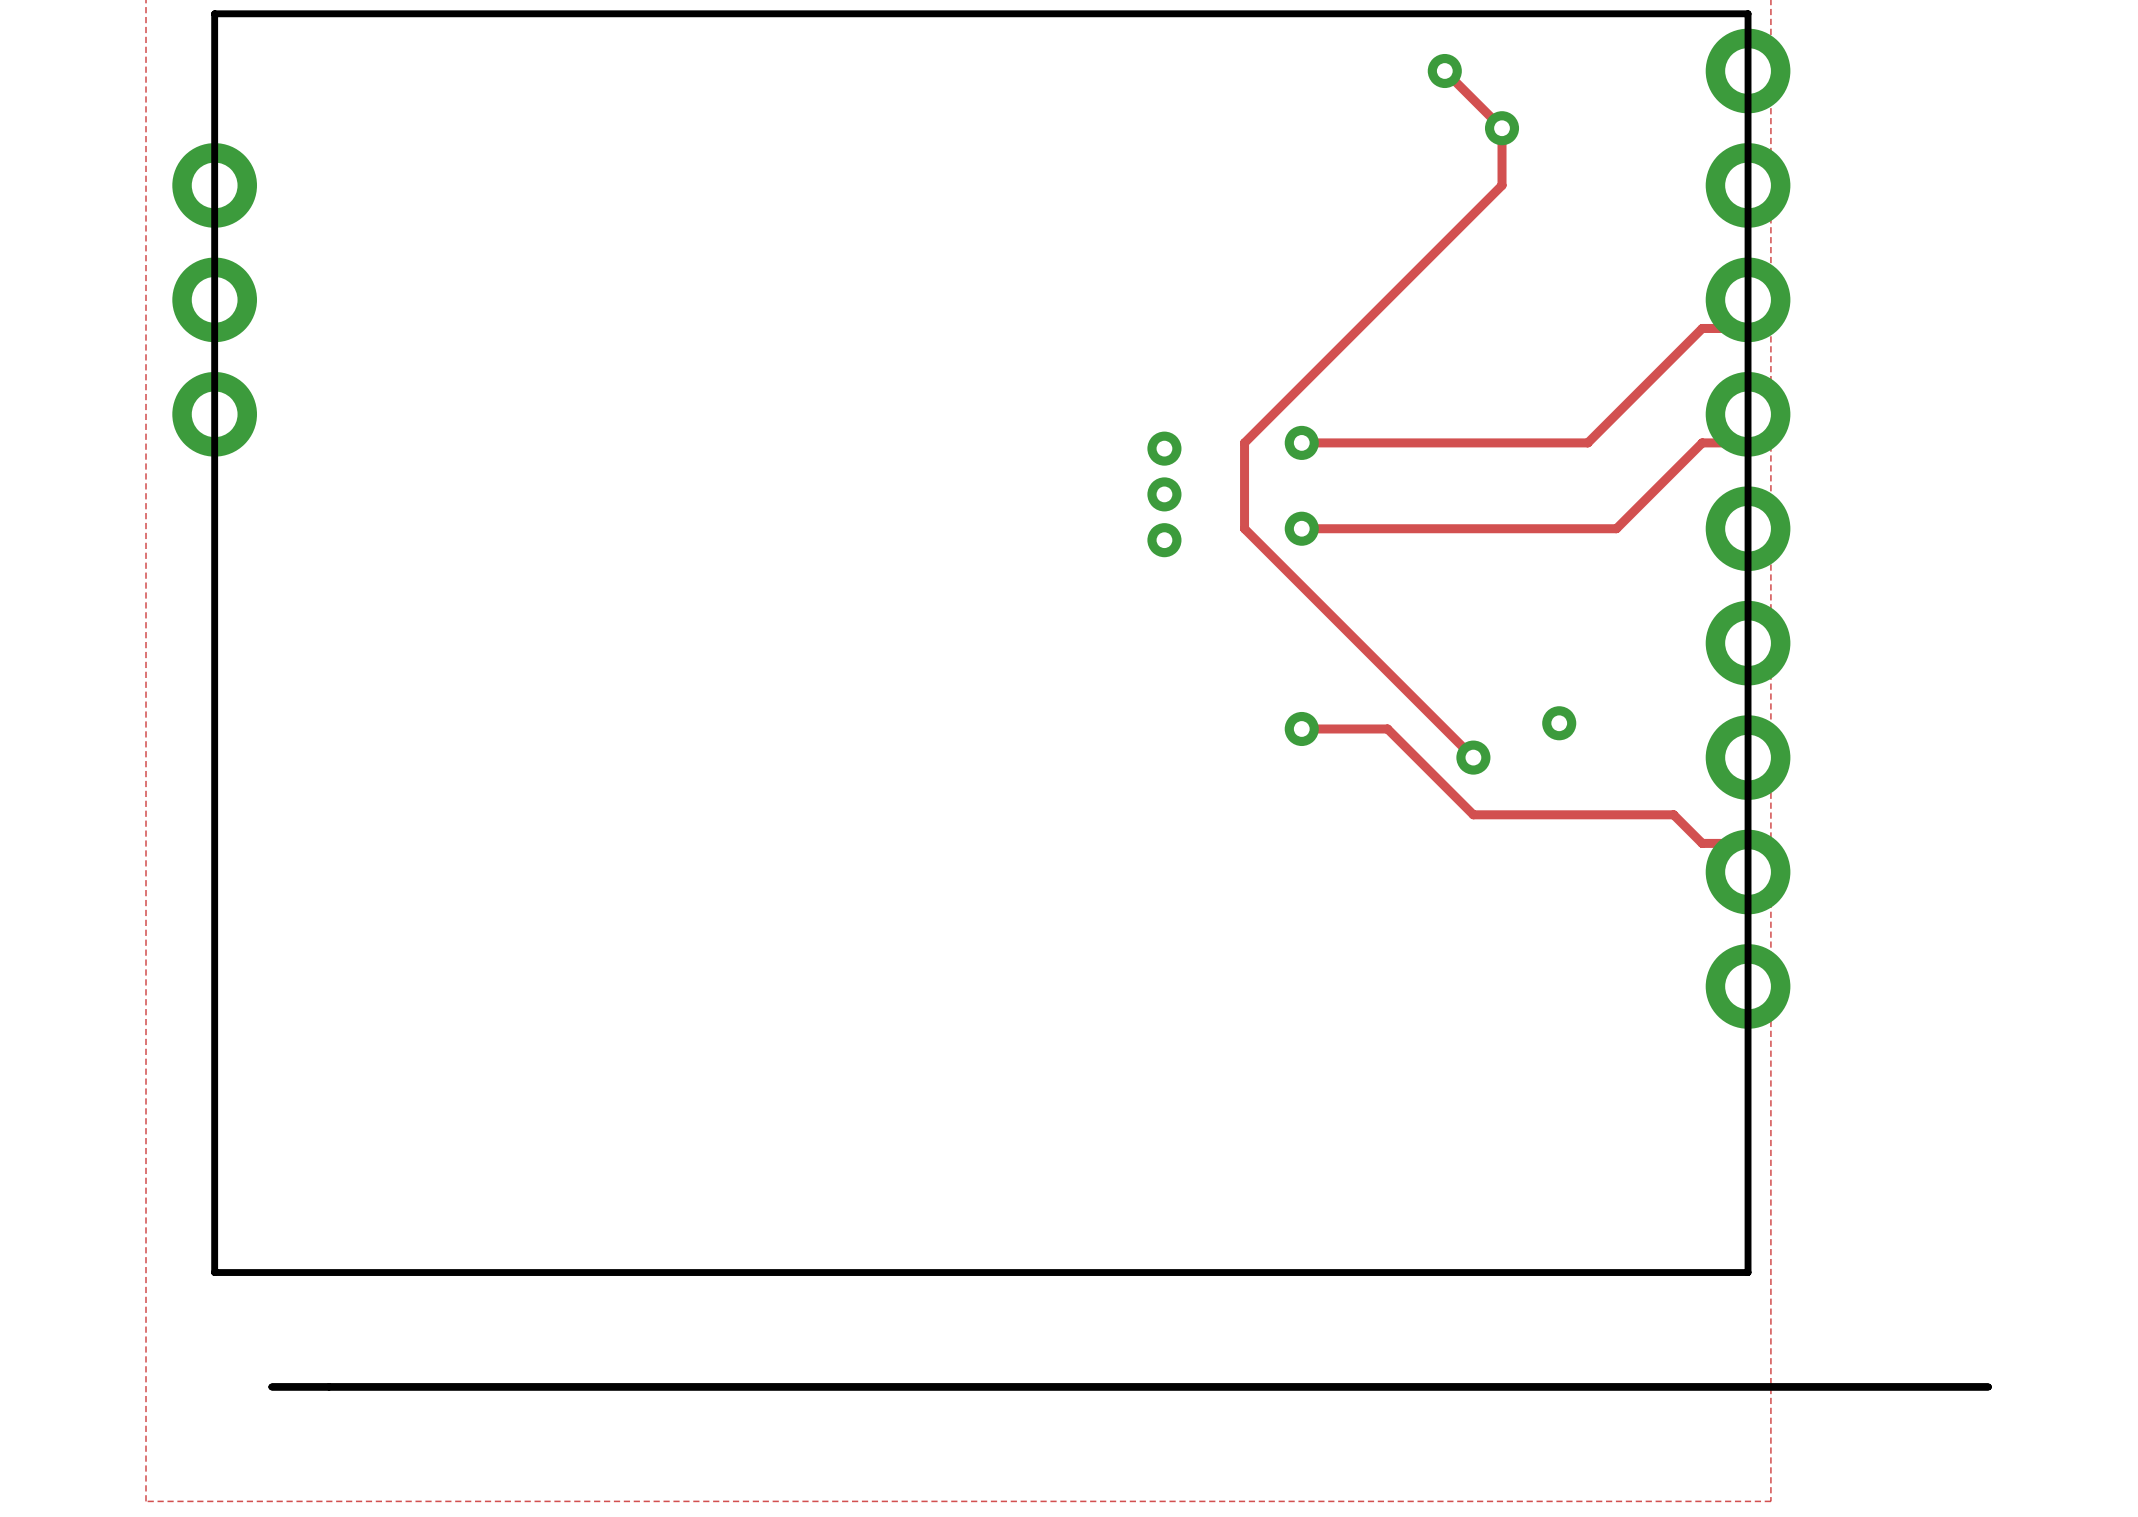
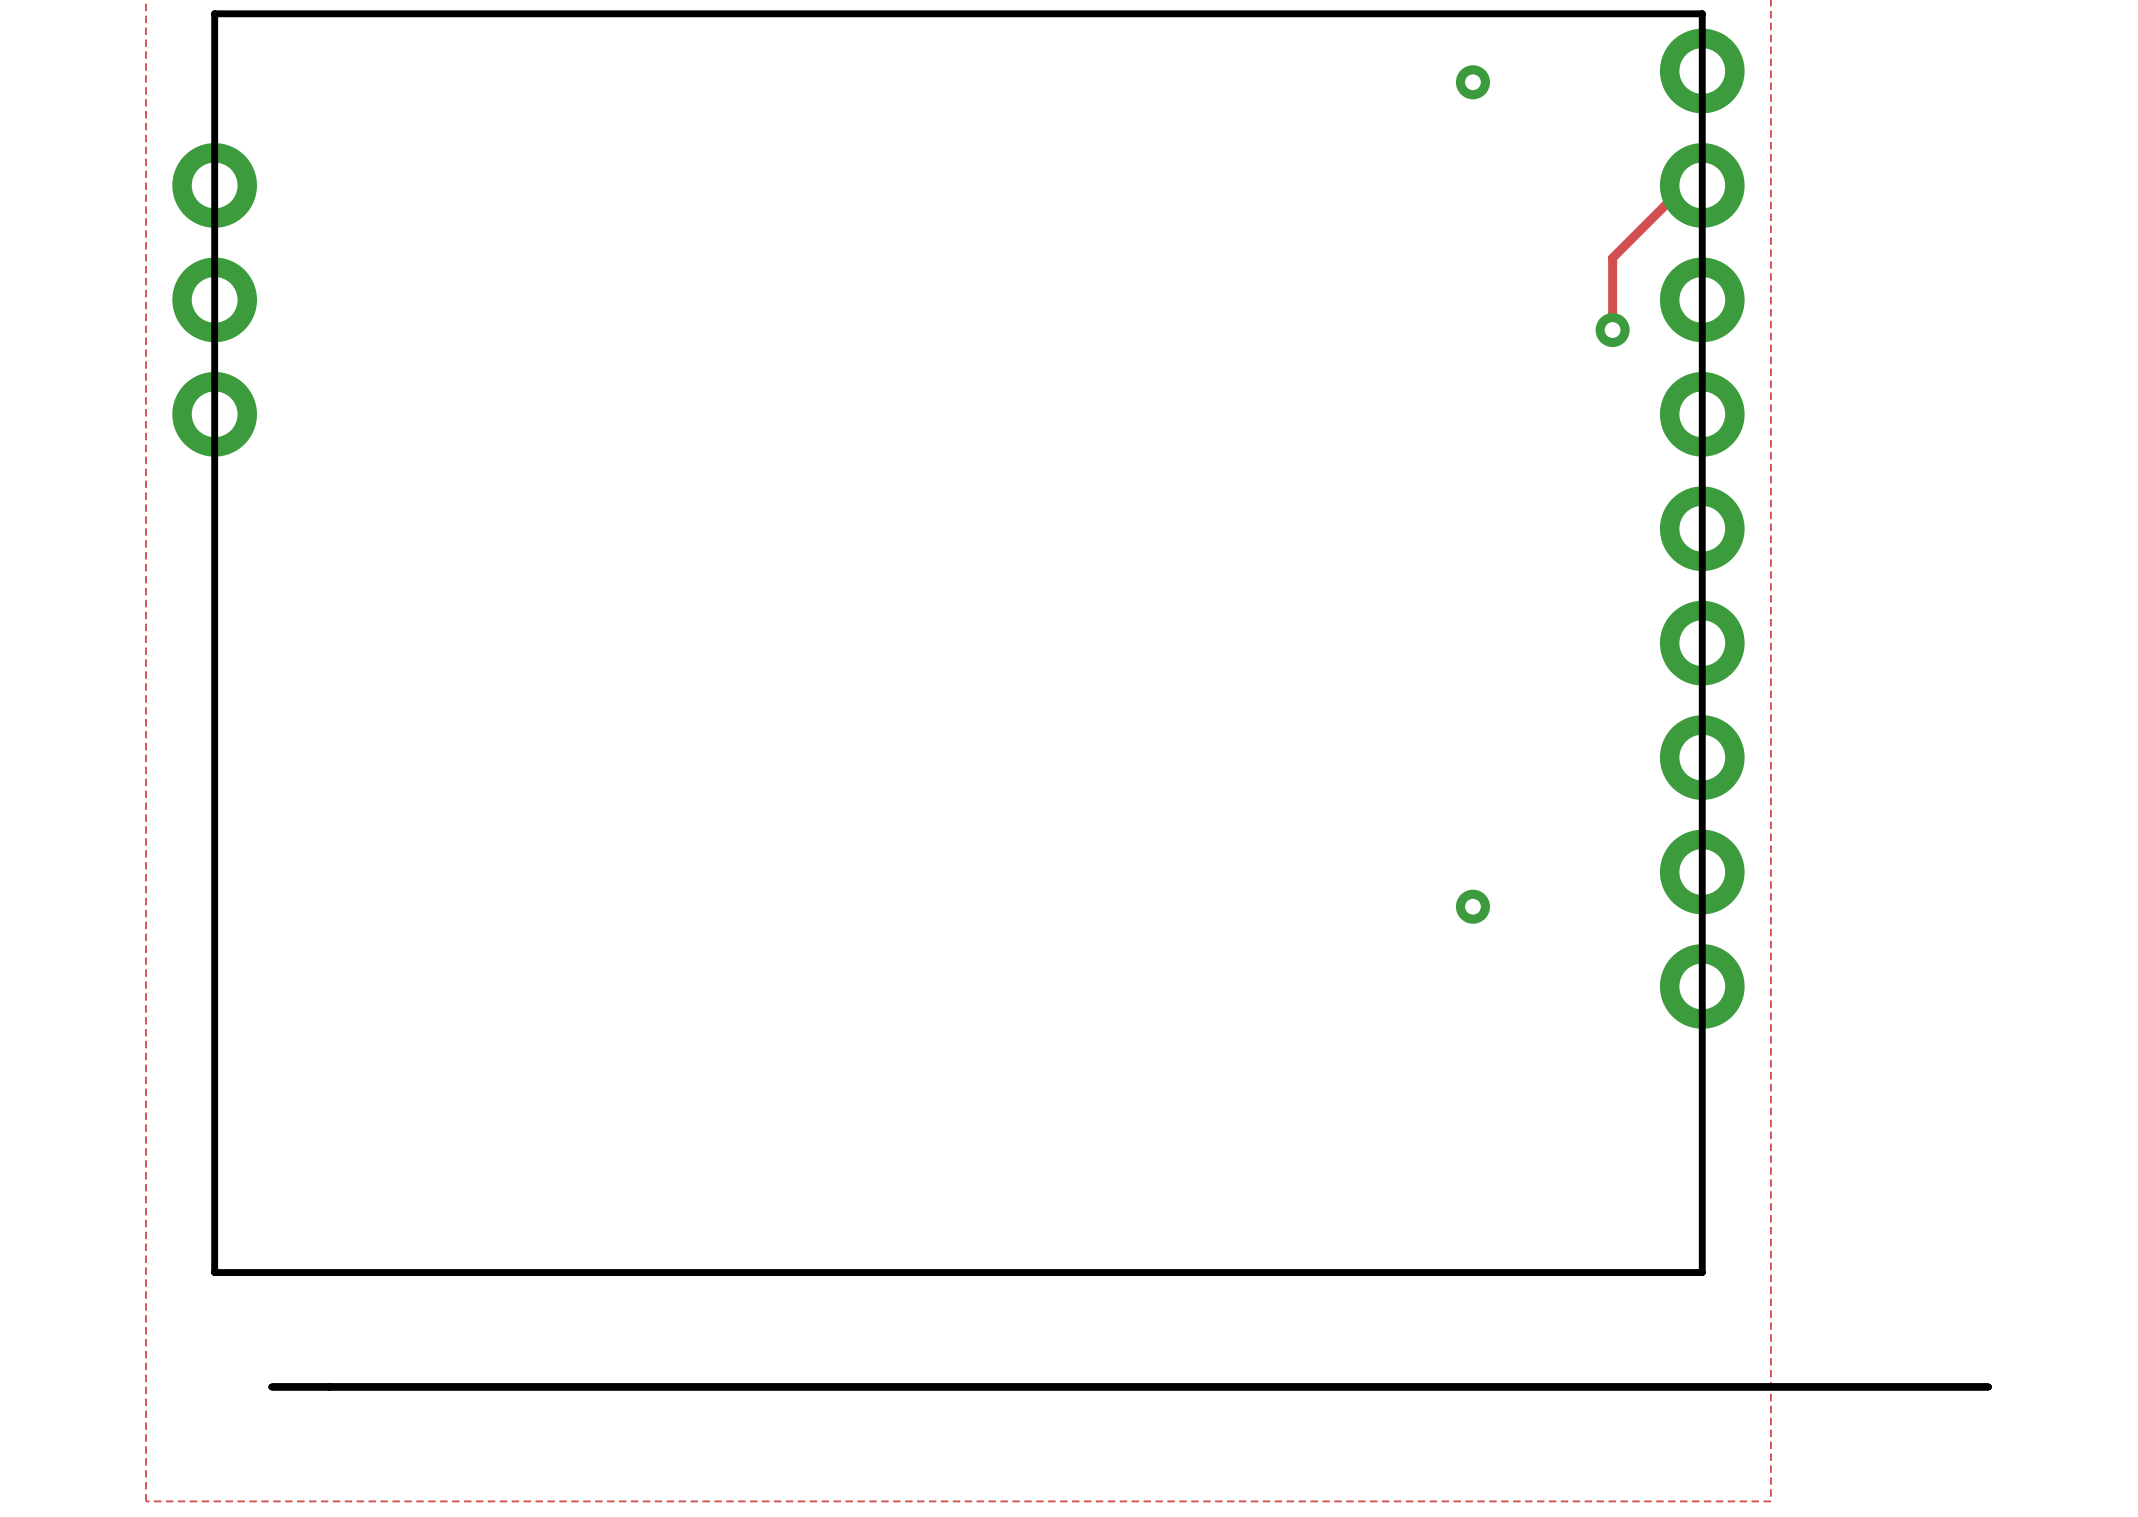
board edge: (1702, 13) (1748, 13) (1748, 1272) (1702, 1272) -> (1702, 13) (1702, 1272)
track: (1444, 71) (1502, 128) (1502, 185) (1244, 442) (1244, 528) (1473, 757) -> none
via position: (1444, 71) -> (1472, 82)
part position: (1748, 71) -> (1702, 71)
via: (1502, 128) -> none
track: none -> (1702, 185) (1684, 185) (1612, 257) (1612, 330)
part position: (1748, 185) -> (1702, 185)
track: (1748, 299) (1759, 299) (1730, 328) (1702, 328) (1587, 442) (1301, 442) -> none
part position: (1748, 299) -> (1702, 299)
via: none -> (1612, 330)
track: (1748, 414) (1759, 414) (1730, 442) (1702, 442) (1616, 528) (1301, 528) -> none
part position: (1748, 414) -> (1702, 414)
via: (1301, 442) -> none
via: (1164, 448) -> none
via: (1164, 494) -> none
via: (1301, 528) -> none
part position: (1748, 528) -> (1702, 528)
via: (1164, 540) -> none
part position: (1748, 643) -> (1702, 643)
via: (1559, 723) -> none
track: (1301, 728) (1387, 728) (1473, 814) (1673, 814) (1702, 843) (1730, 843) (1759, 872) (1748, 872) -> none
via: (1301, 728) -> none
via: (1473, 757) -> none
part position: (1748, 757) -> (1702, 757)
part position: (1748, 872) -> (1702, 872)
via: none -> (1472, 906)
part position: (1748, 986) -> (1702, 986)

